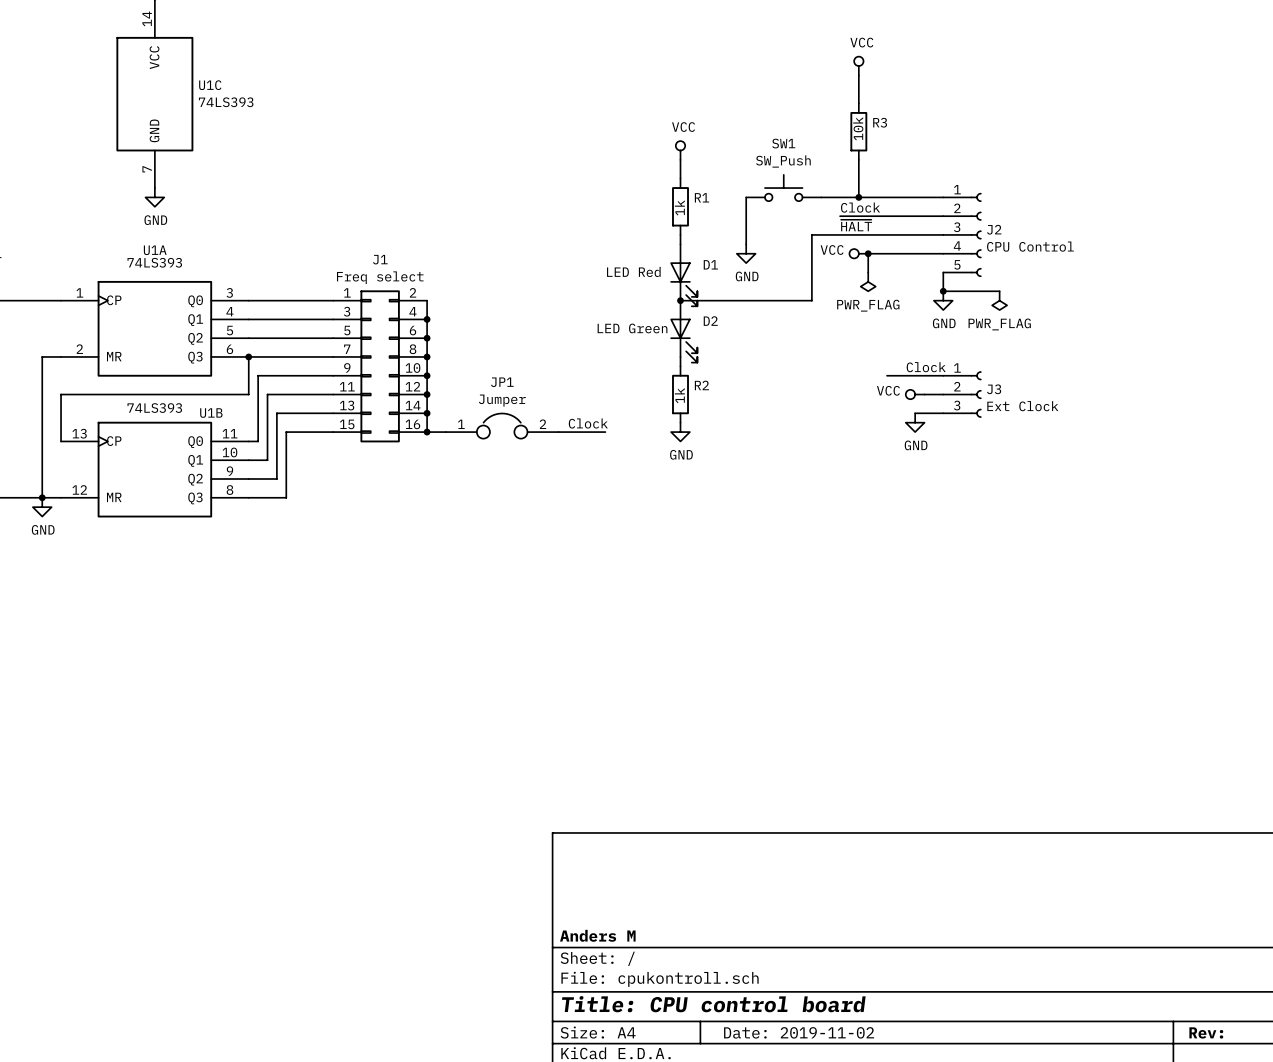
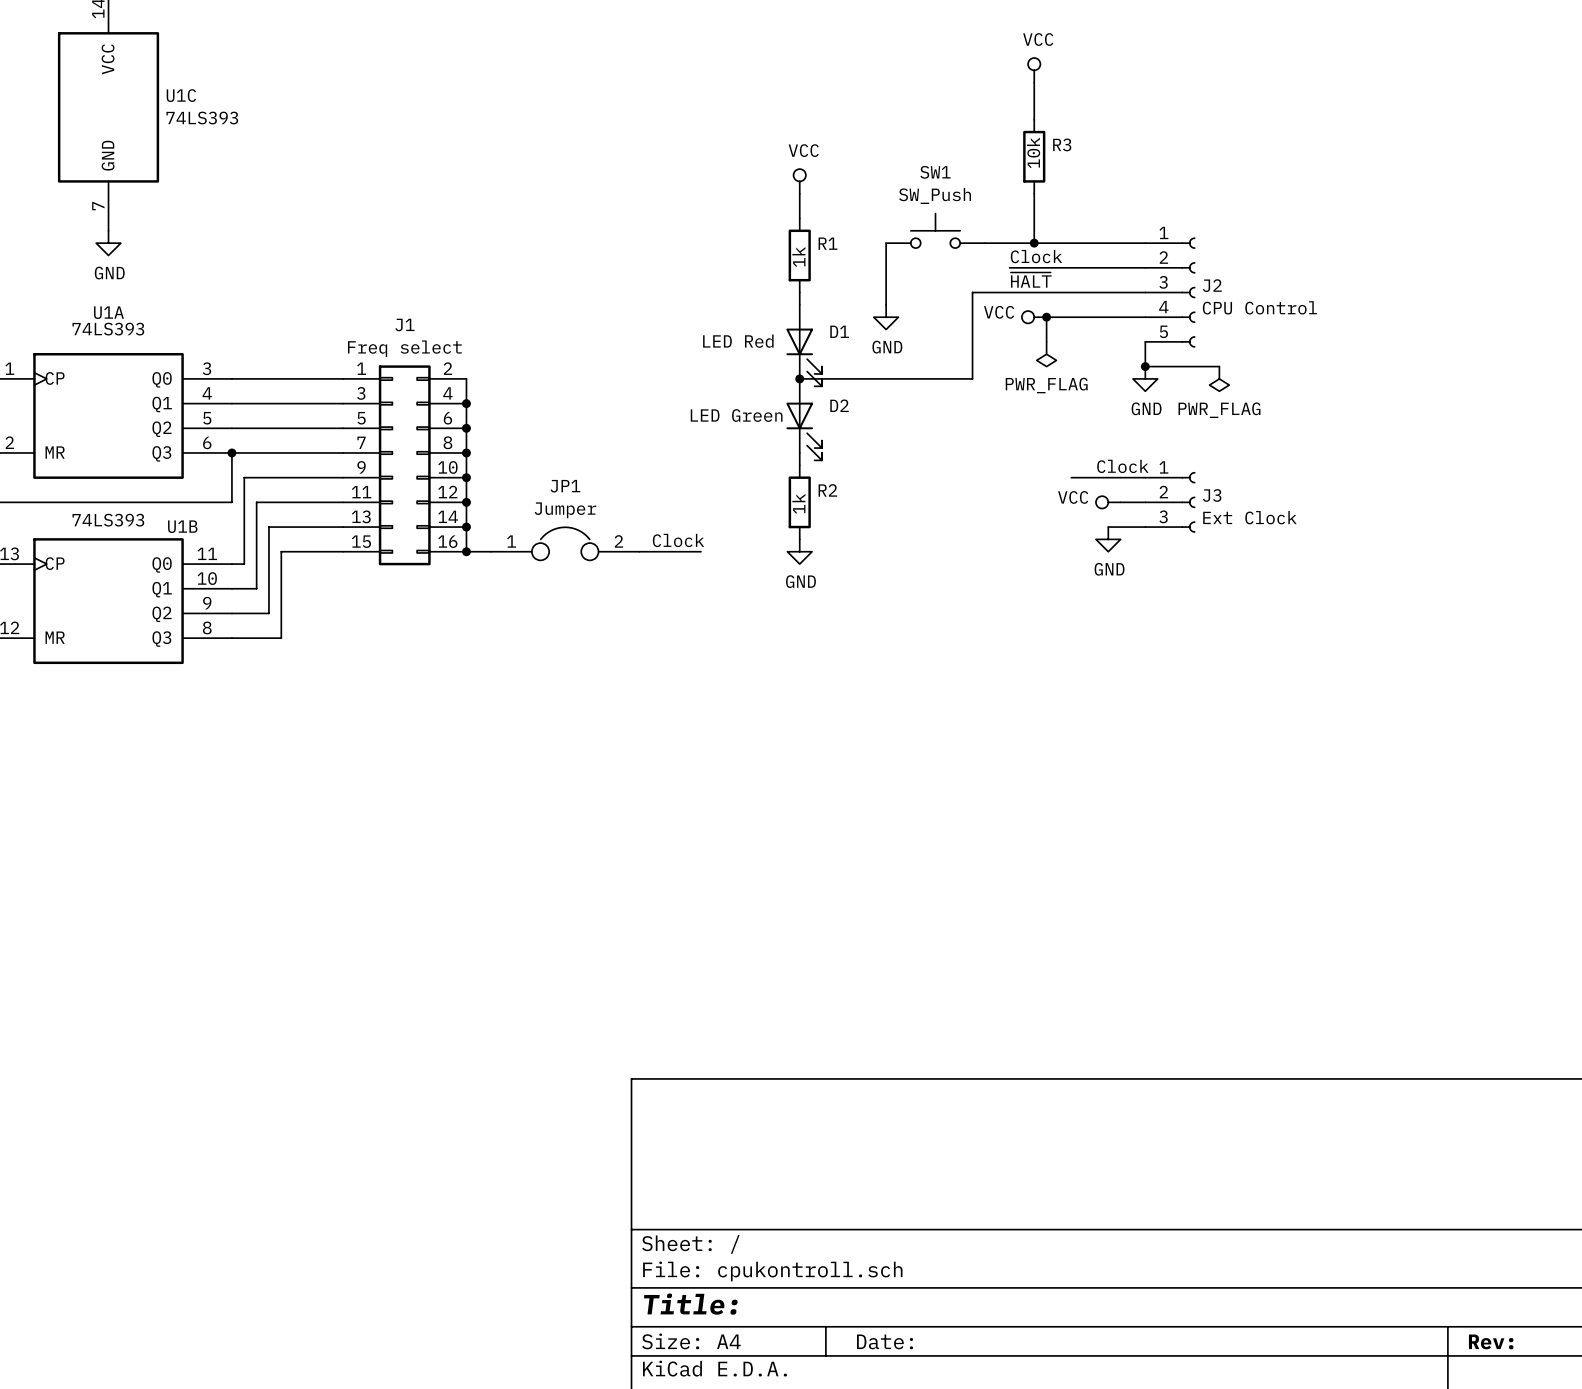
title block: Anders M (597, 935) -> none
title block: Title: CPU control board (713, 1004) -> Title: (690, 1304)
title block: Date: 2019-11-02 (799, 1032) -> Date: (885, 1341)

